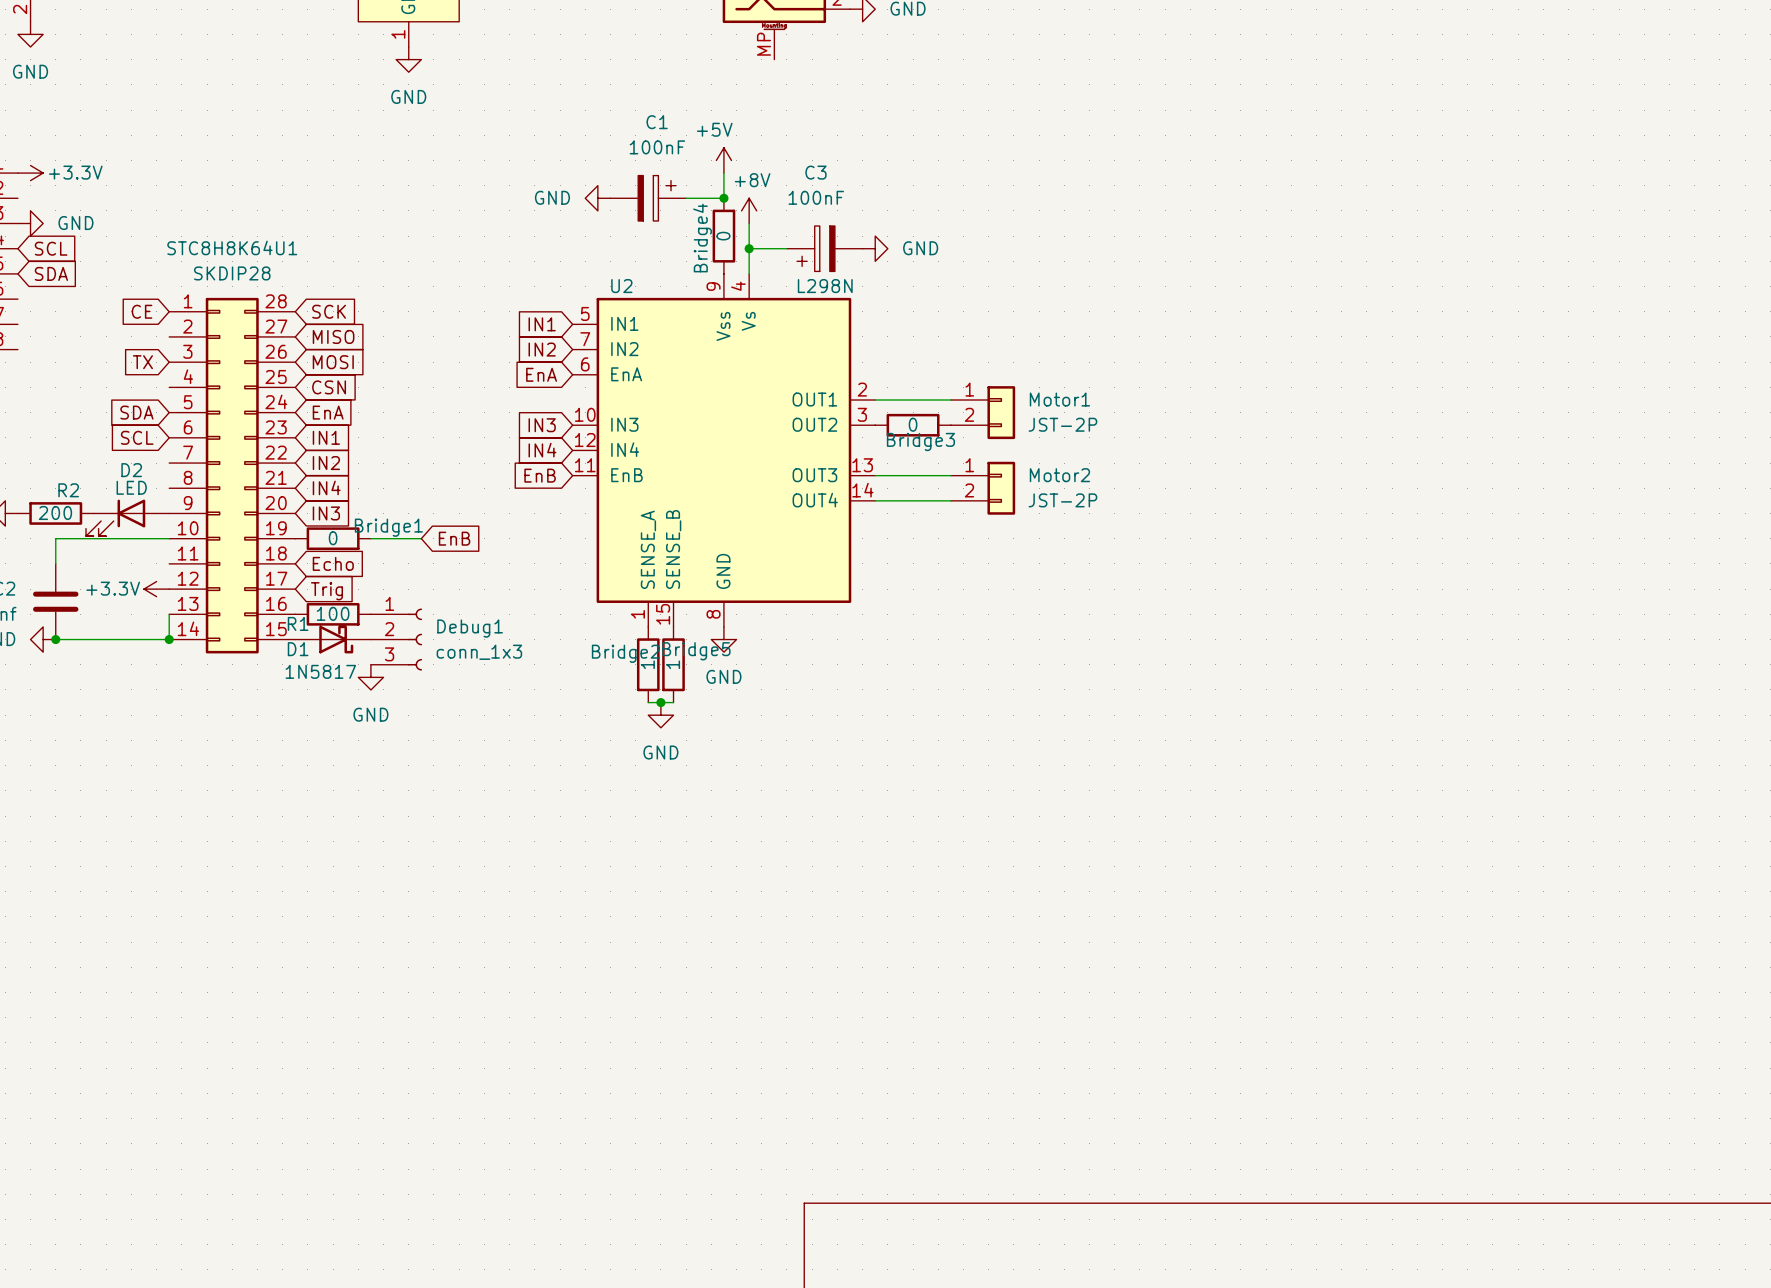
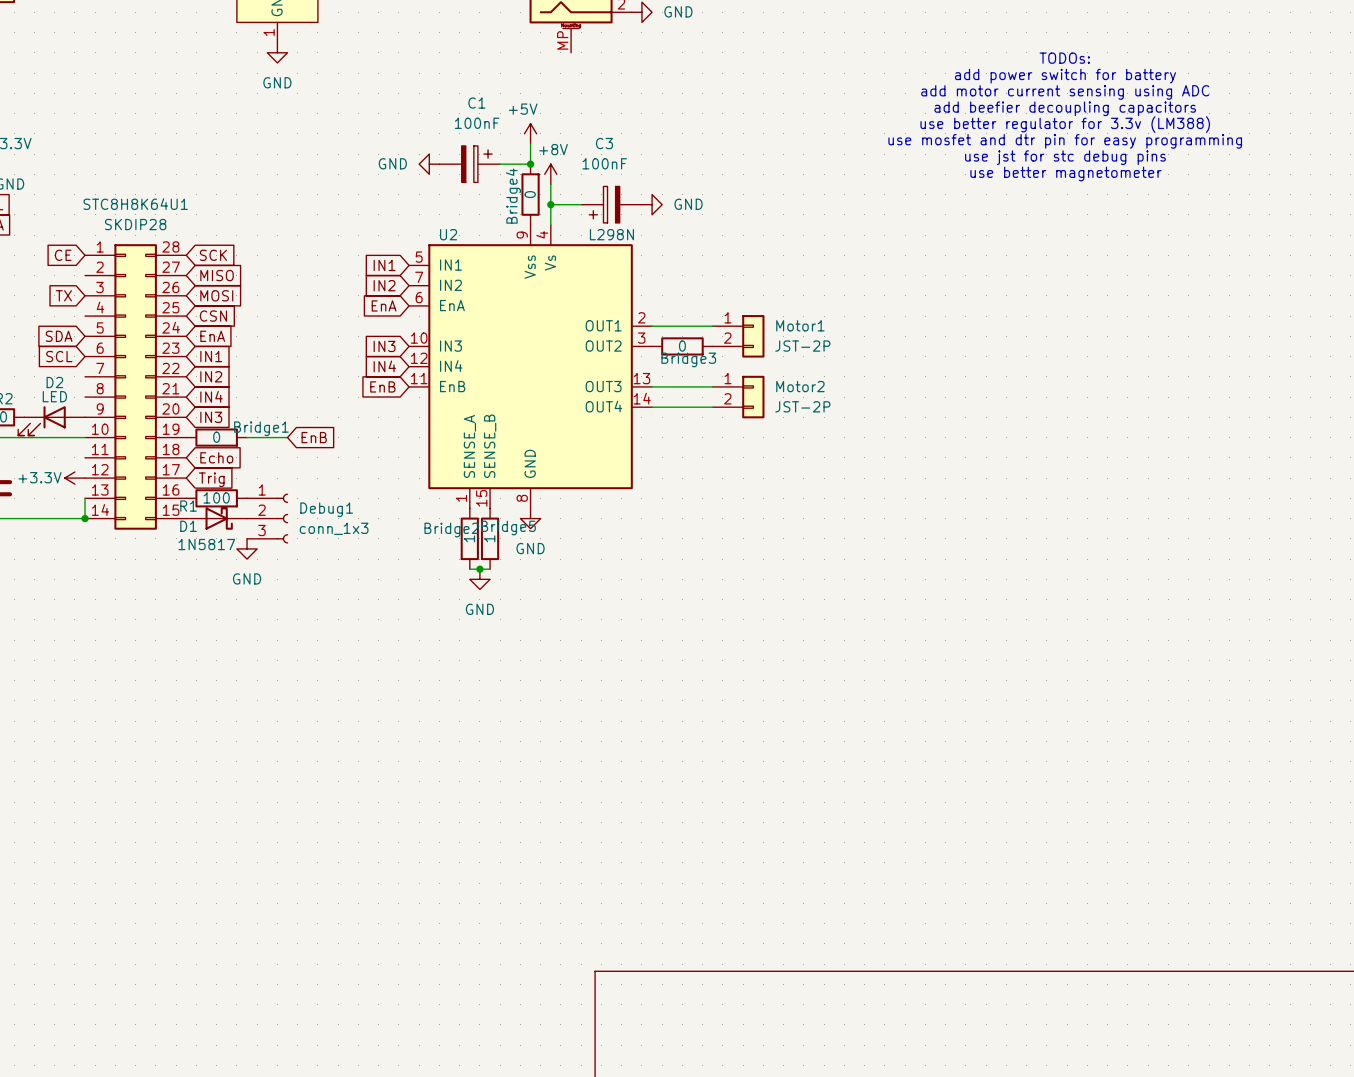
text: none -> TODOs: (1064, 58)
text: none -> add power switch for battery (1065, 76)
text: none -> add motor current sensing using ADC (1065, 92)
text: none -> add beefier decoupling capacitors (1065, 108)
text: none -> use better regulator for 3.3v (LM388) (1065, 124)
text: none -> use mosfet and dtr pin for easy programming (1065, 141)
text: none -> use jst for stc debug pins (1065, 157)
text: none -> use better magnetometer (1065, 173)

